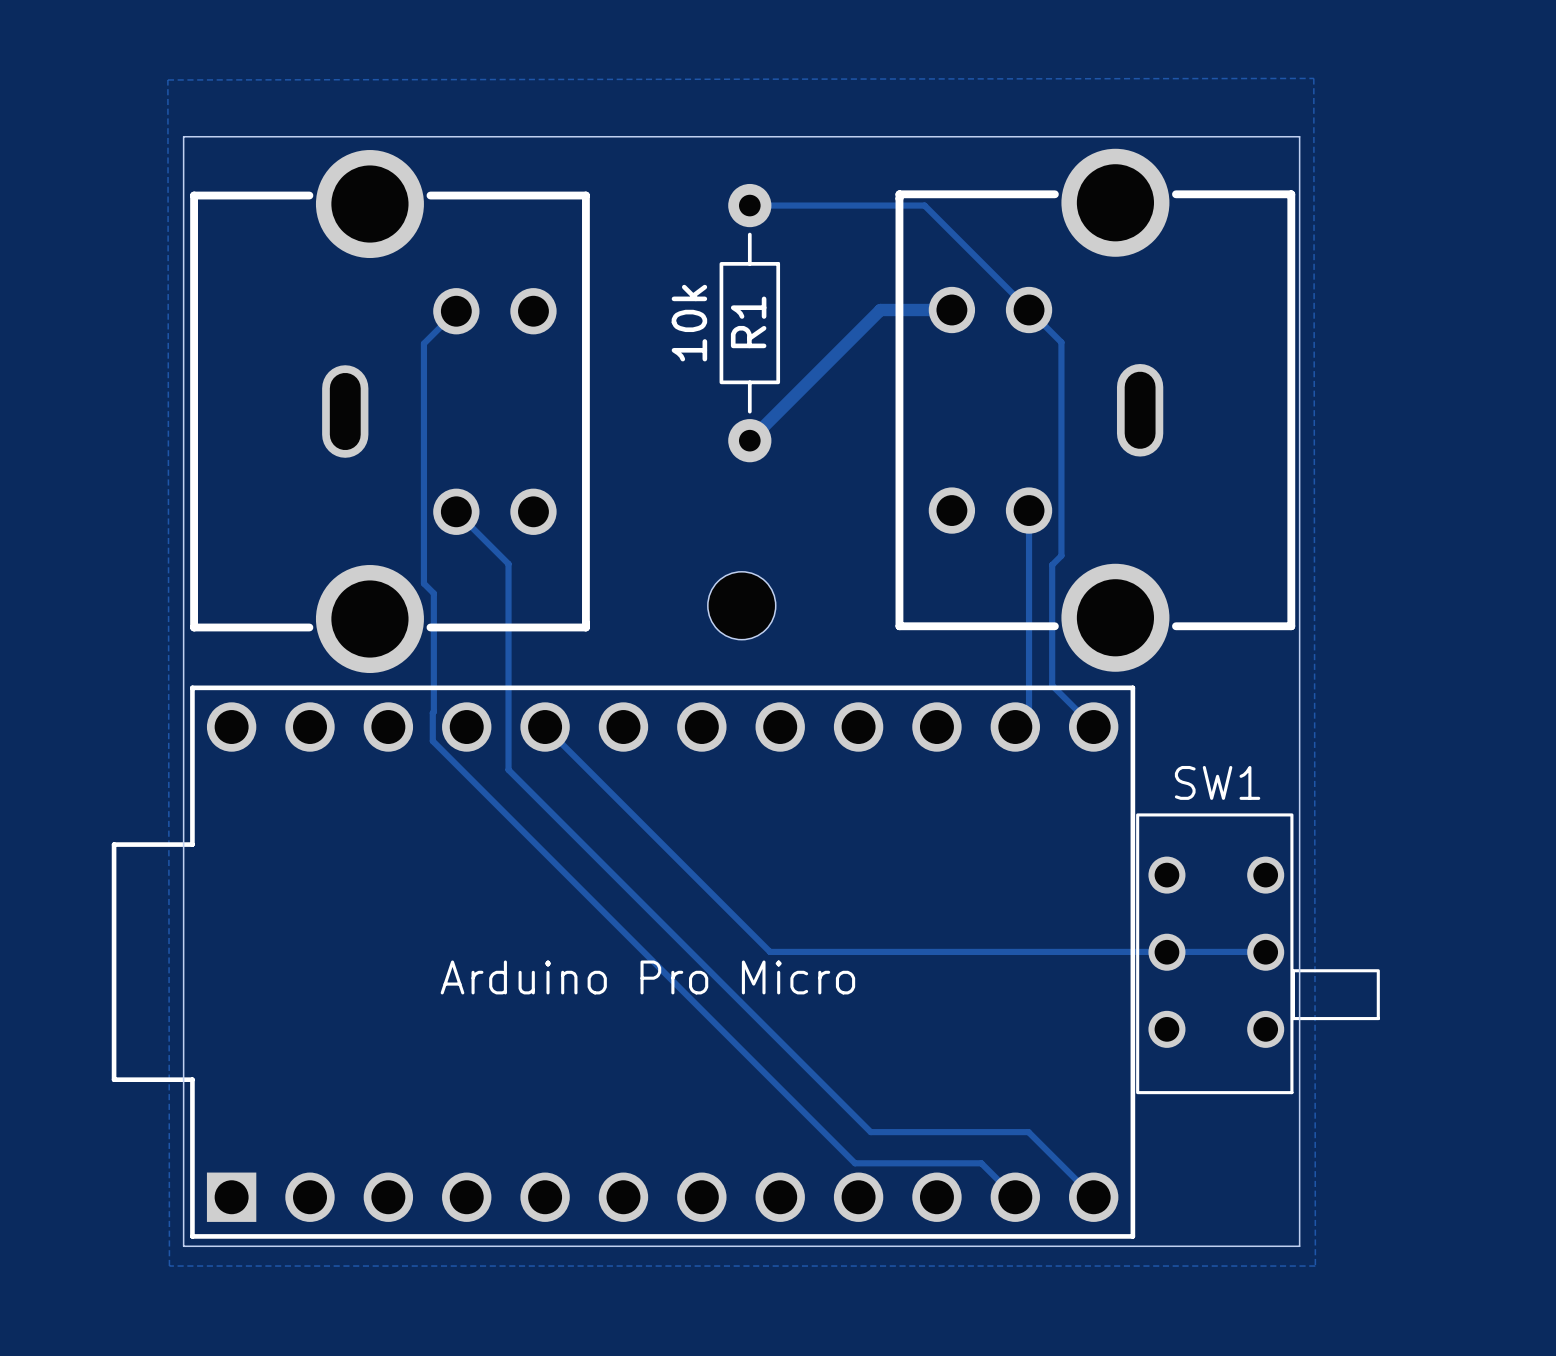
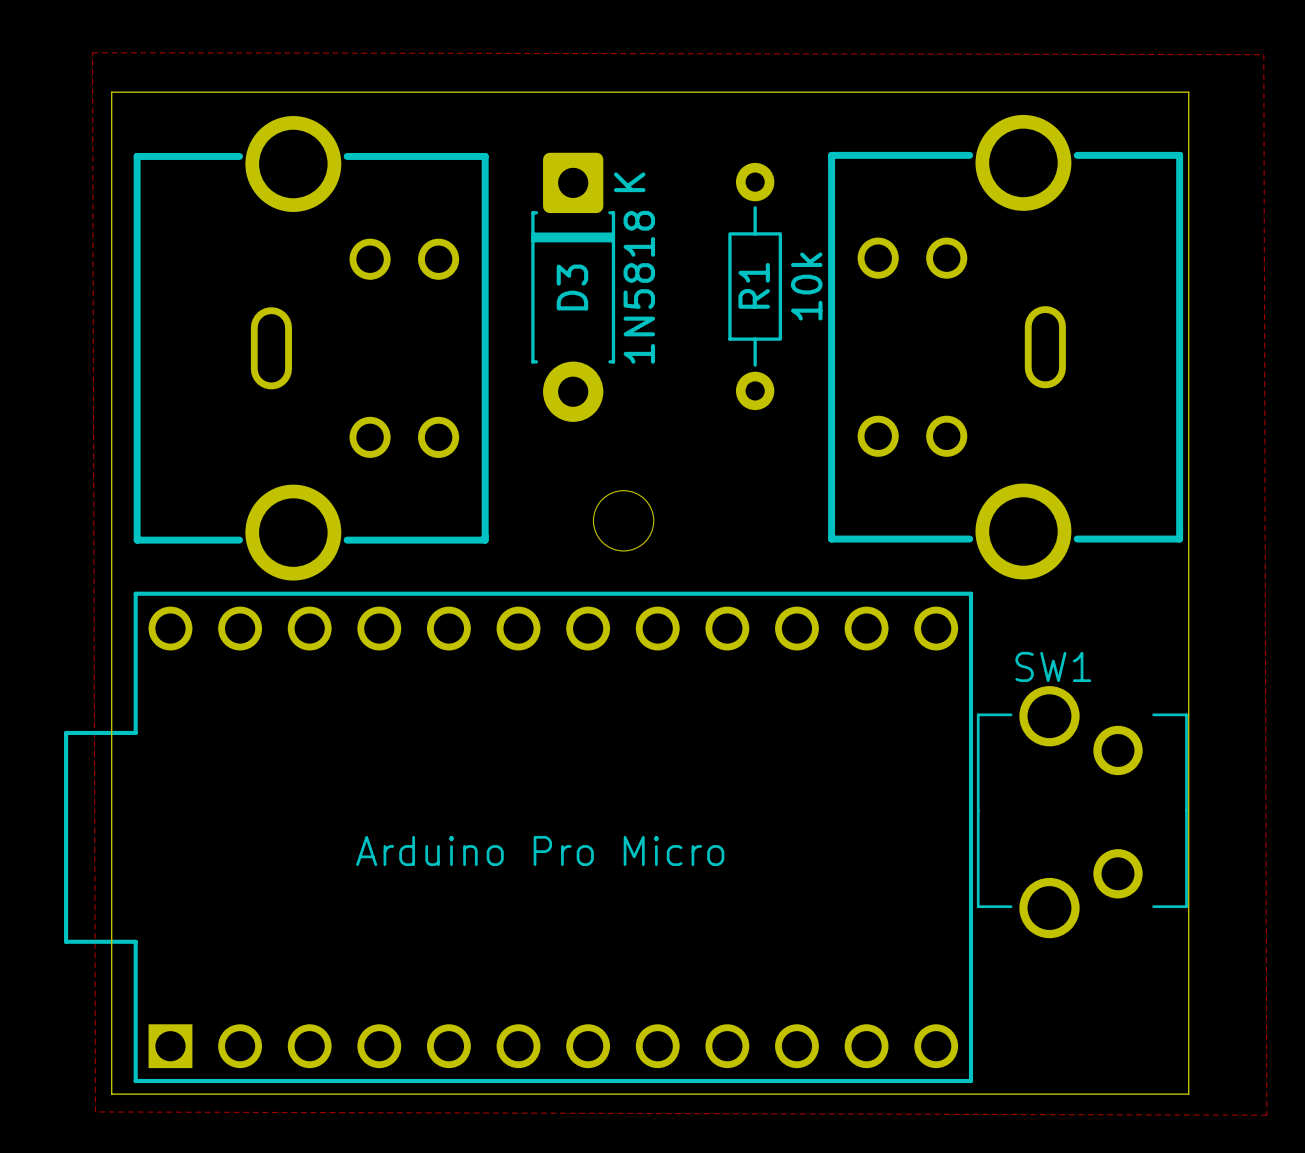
zone outline: (1313, 78) (167, 79) (169, 1266) (1315, 1266) (1313, 78) -> (92, 52) (95, 1111) (1266, 1115) (1263, 54) (92, 52)
board edge: (183, 136) (1299, 136) (1299, 1246) (183, 1246) (183, 136) -> (111, 92) (111, 1094) (1188, 1094) (1188, 92) (111, 92)
track: (749, 205) (924, 205) (1061, 342) (1061, 555) (1052, 565) (1052, 685) (1093, 727) -> none
track: (951, 310) (880, 310) (749, 440) -> none
track: (456, 311) (423, 343) (423, 583) (433, 593) (432, 741) (855, 1163) (981, 1163) (1015, 1197) -> none
R1 value position: 10k (689, 323) -> 10k (806, 286)
R1 position: (749, 323) -> (755, 286)
D3: none -> 1N5818 (573, 287)
part position: (1095, 410) -> (1005, 347)
track: (1029, 510) (1029, 713) (1015, 727) -> none
track: (456, 511) (508, 563) (508, 769) (870, 1132) (1028, 1132) (1093, 1197) -> none
track: (545, 727) (770, 951) (1265, 951) -> none
SW1 footprint: [1136, 813, 1380, 1095] -> [976, 686, 1188, 939]

